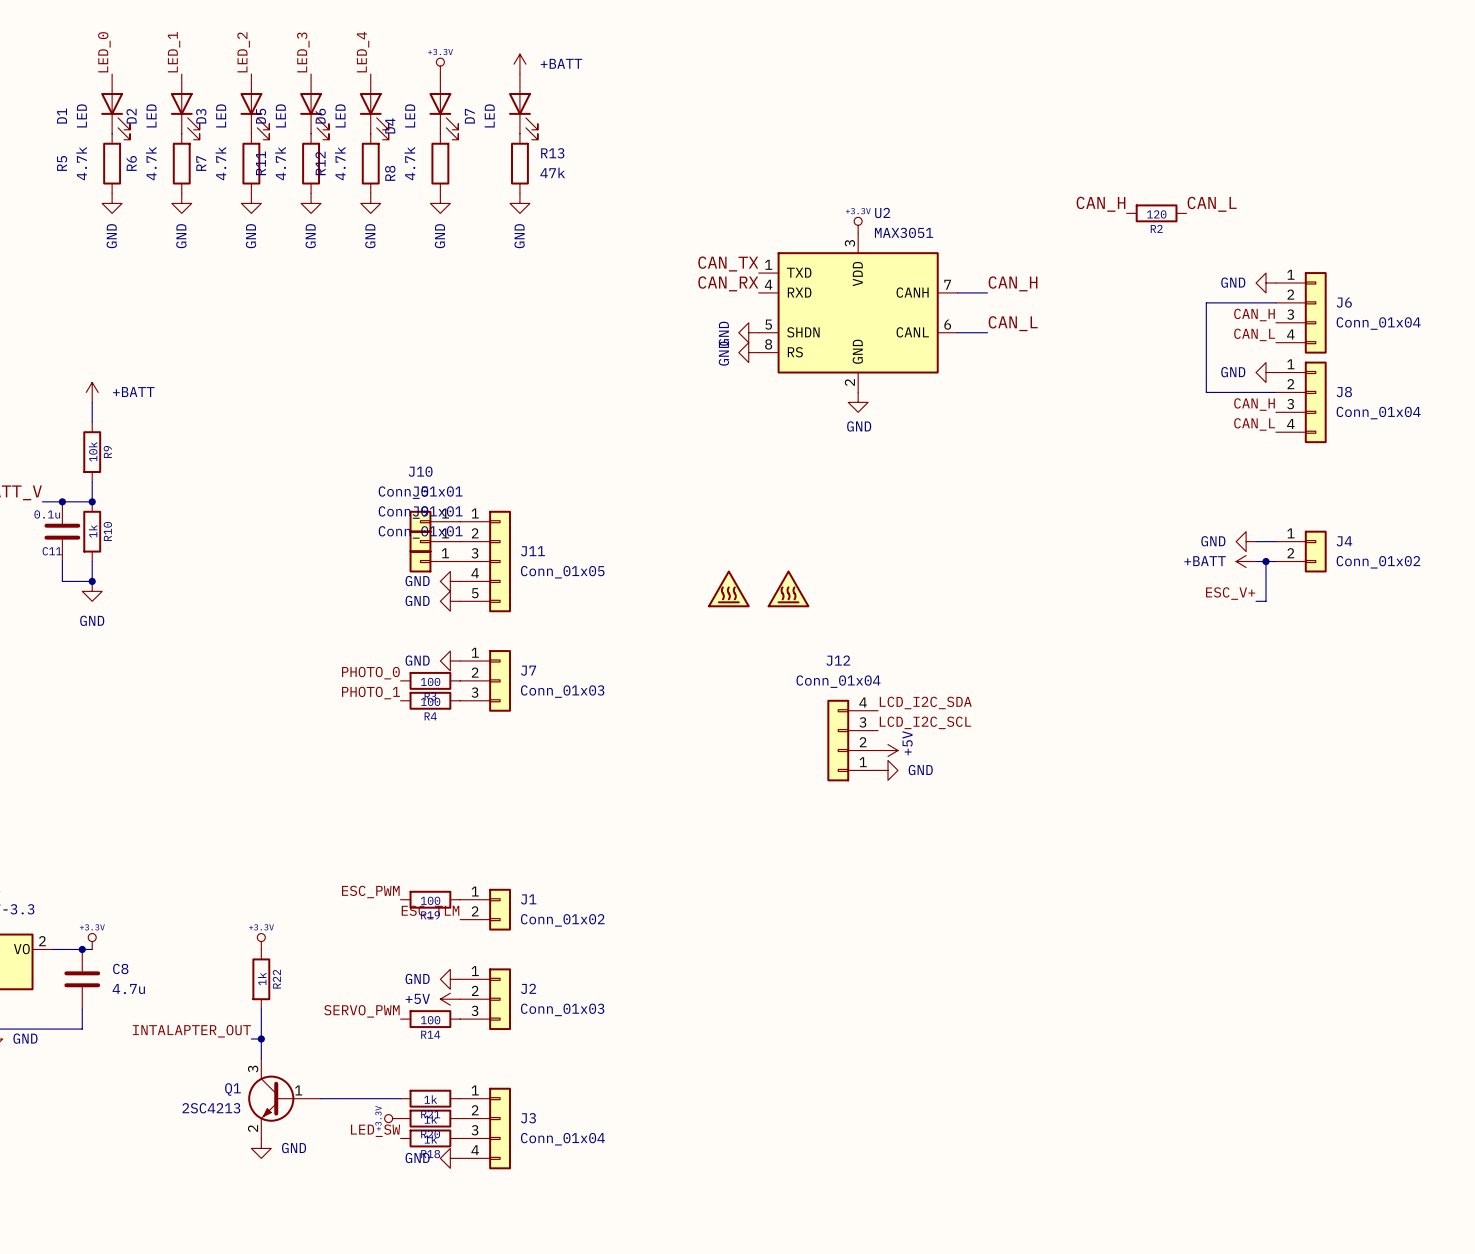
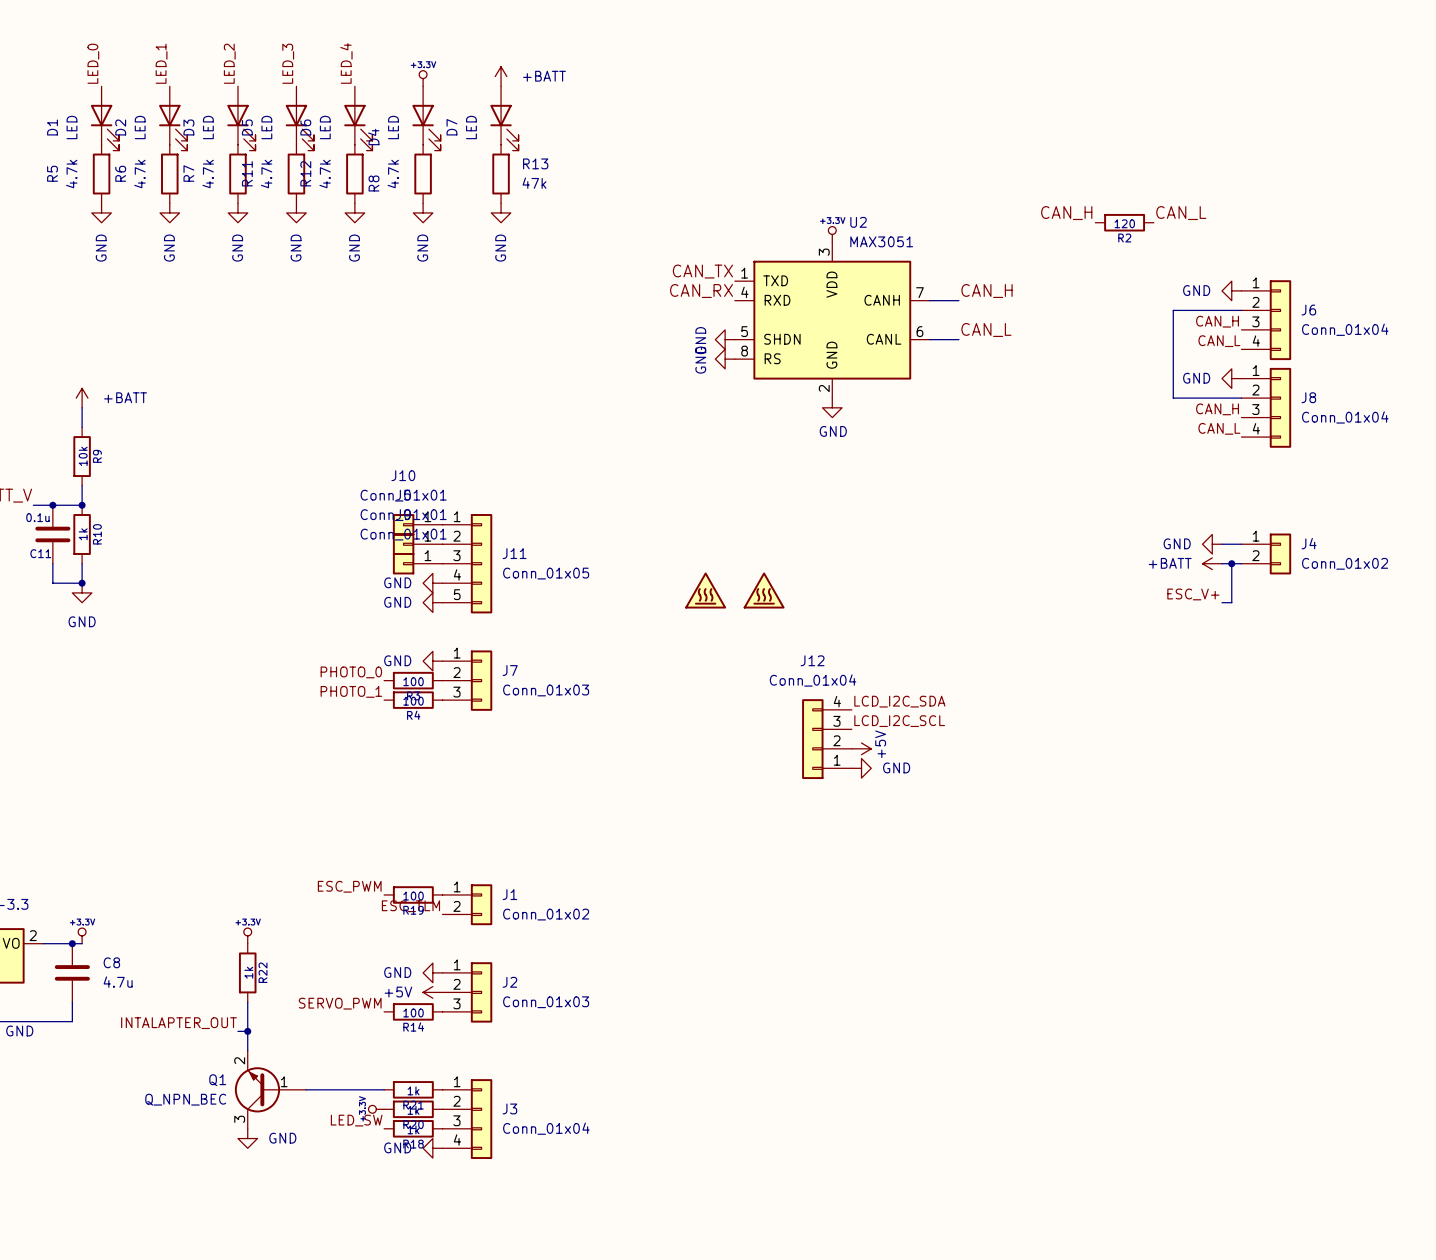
Q1 flip: as is (271, 1098) -> up-down (257, 1089)
Q1 value: 2SC4213 (211, 1108) -> Q_NPN_BEC (185, 1099)

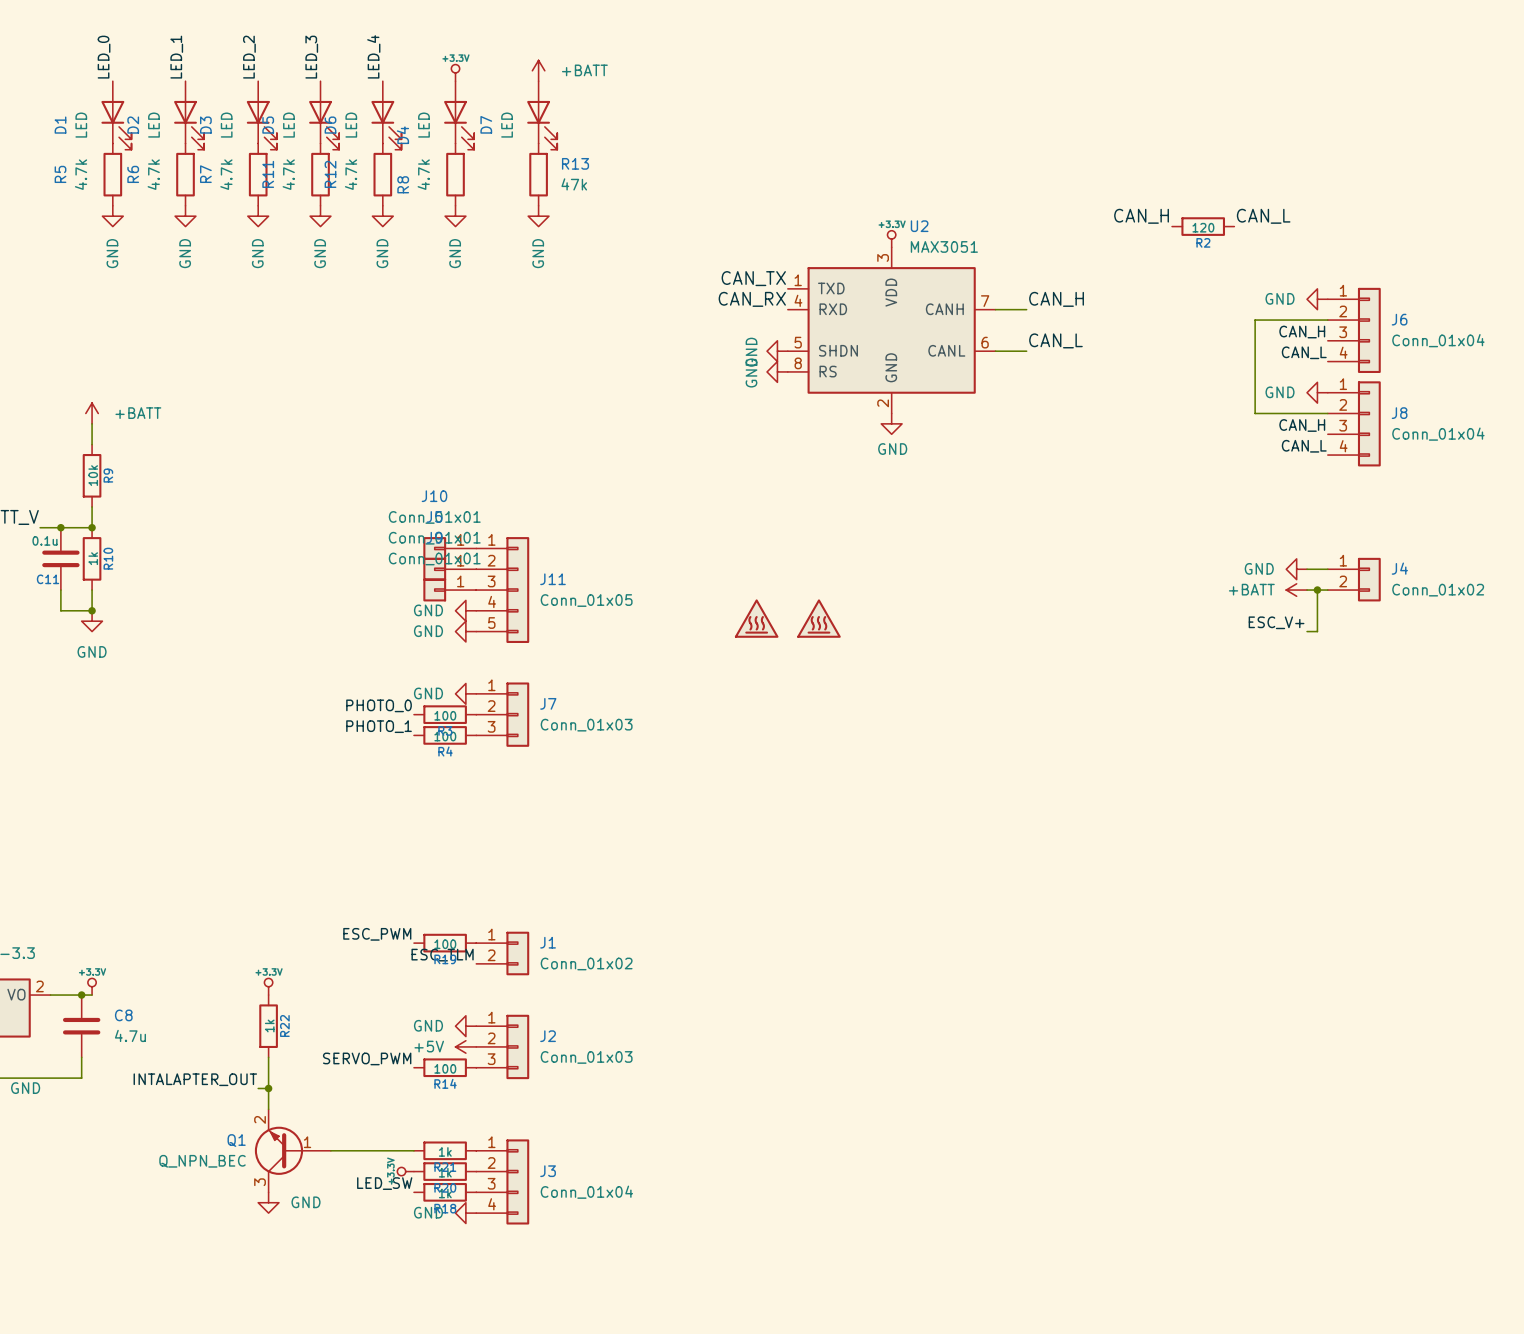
label: LCD_I2C_SDA (899, 701) -> none
label: LCD_I2C_SCL (899, 721) -> none
J12: Conn_01x04 (826, 739) -> none
power symbol: +5V (861, 748) -> none
power symbol: GND (861, 768) -> none

